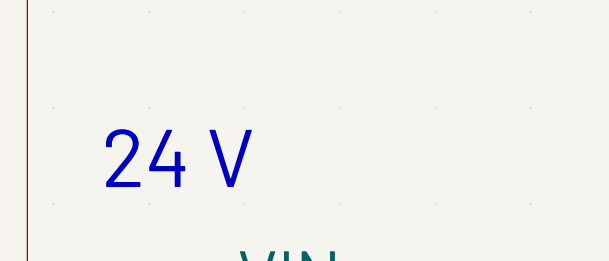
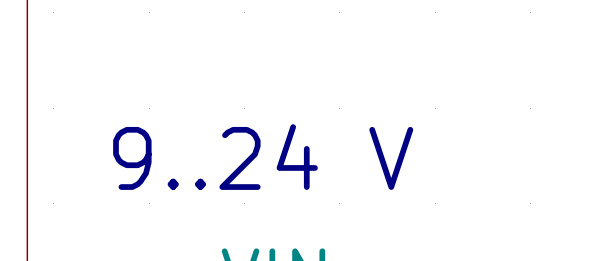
text: 24 V (179, 158) -> 9..24 V (263, 157)

